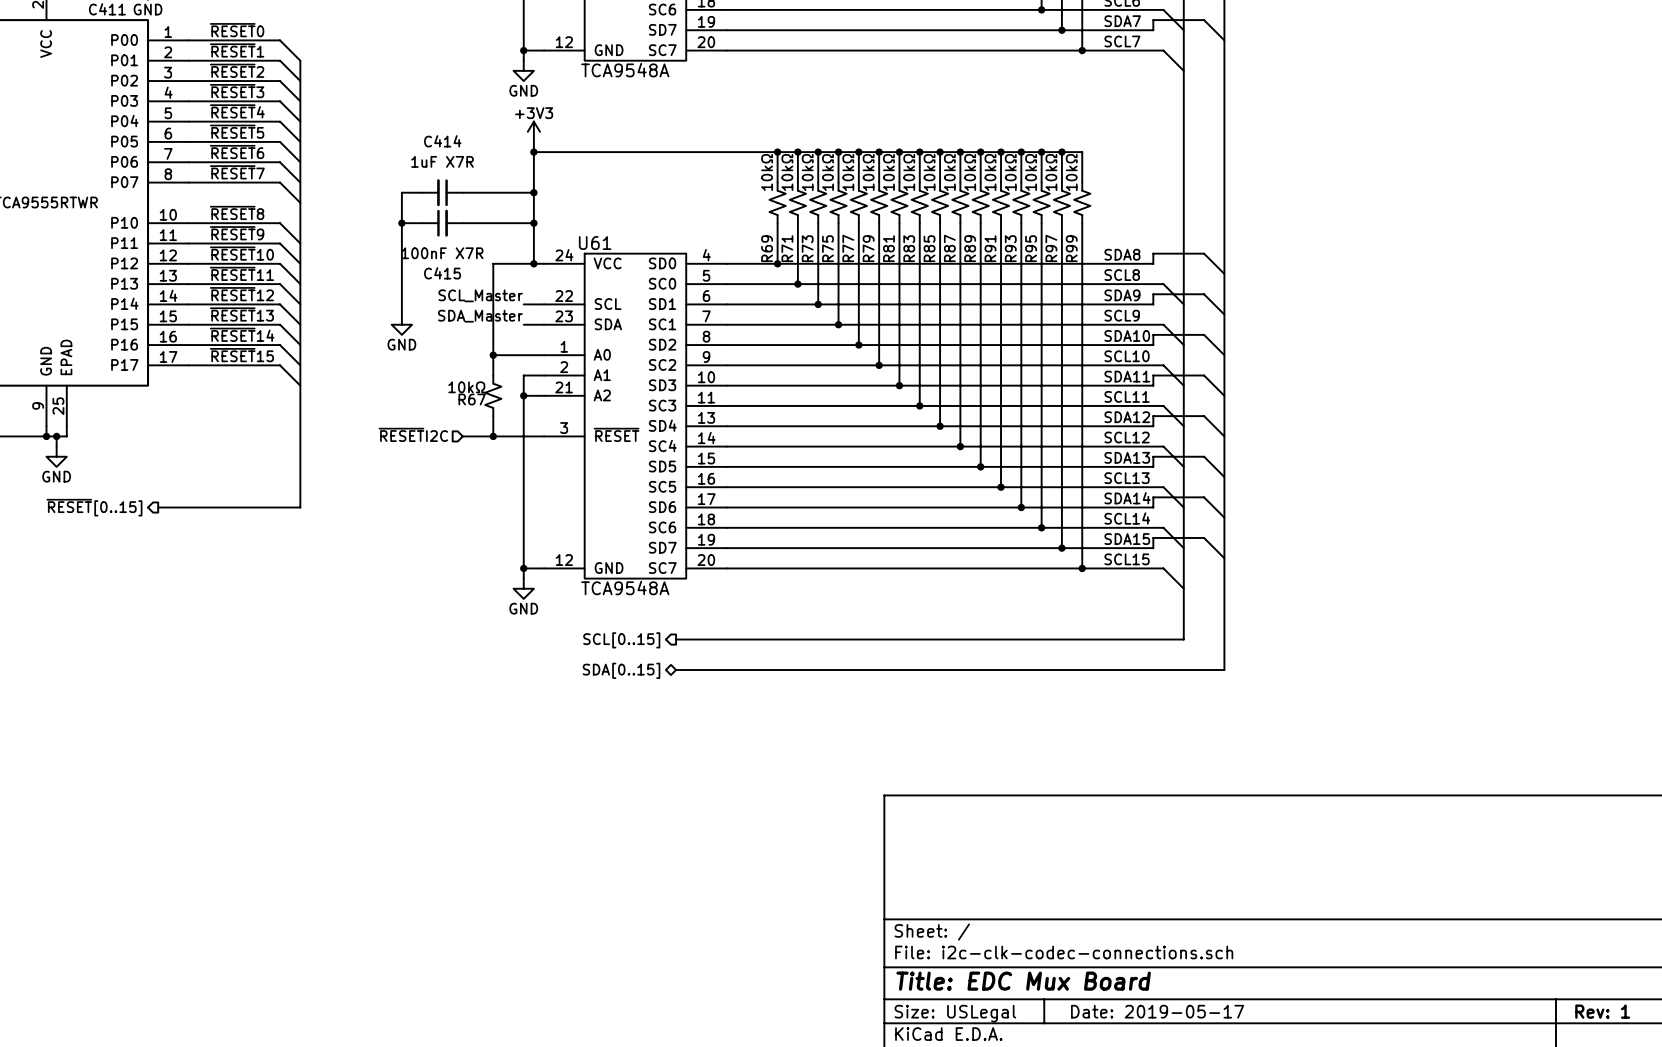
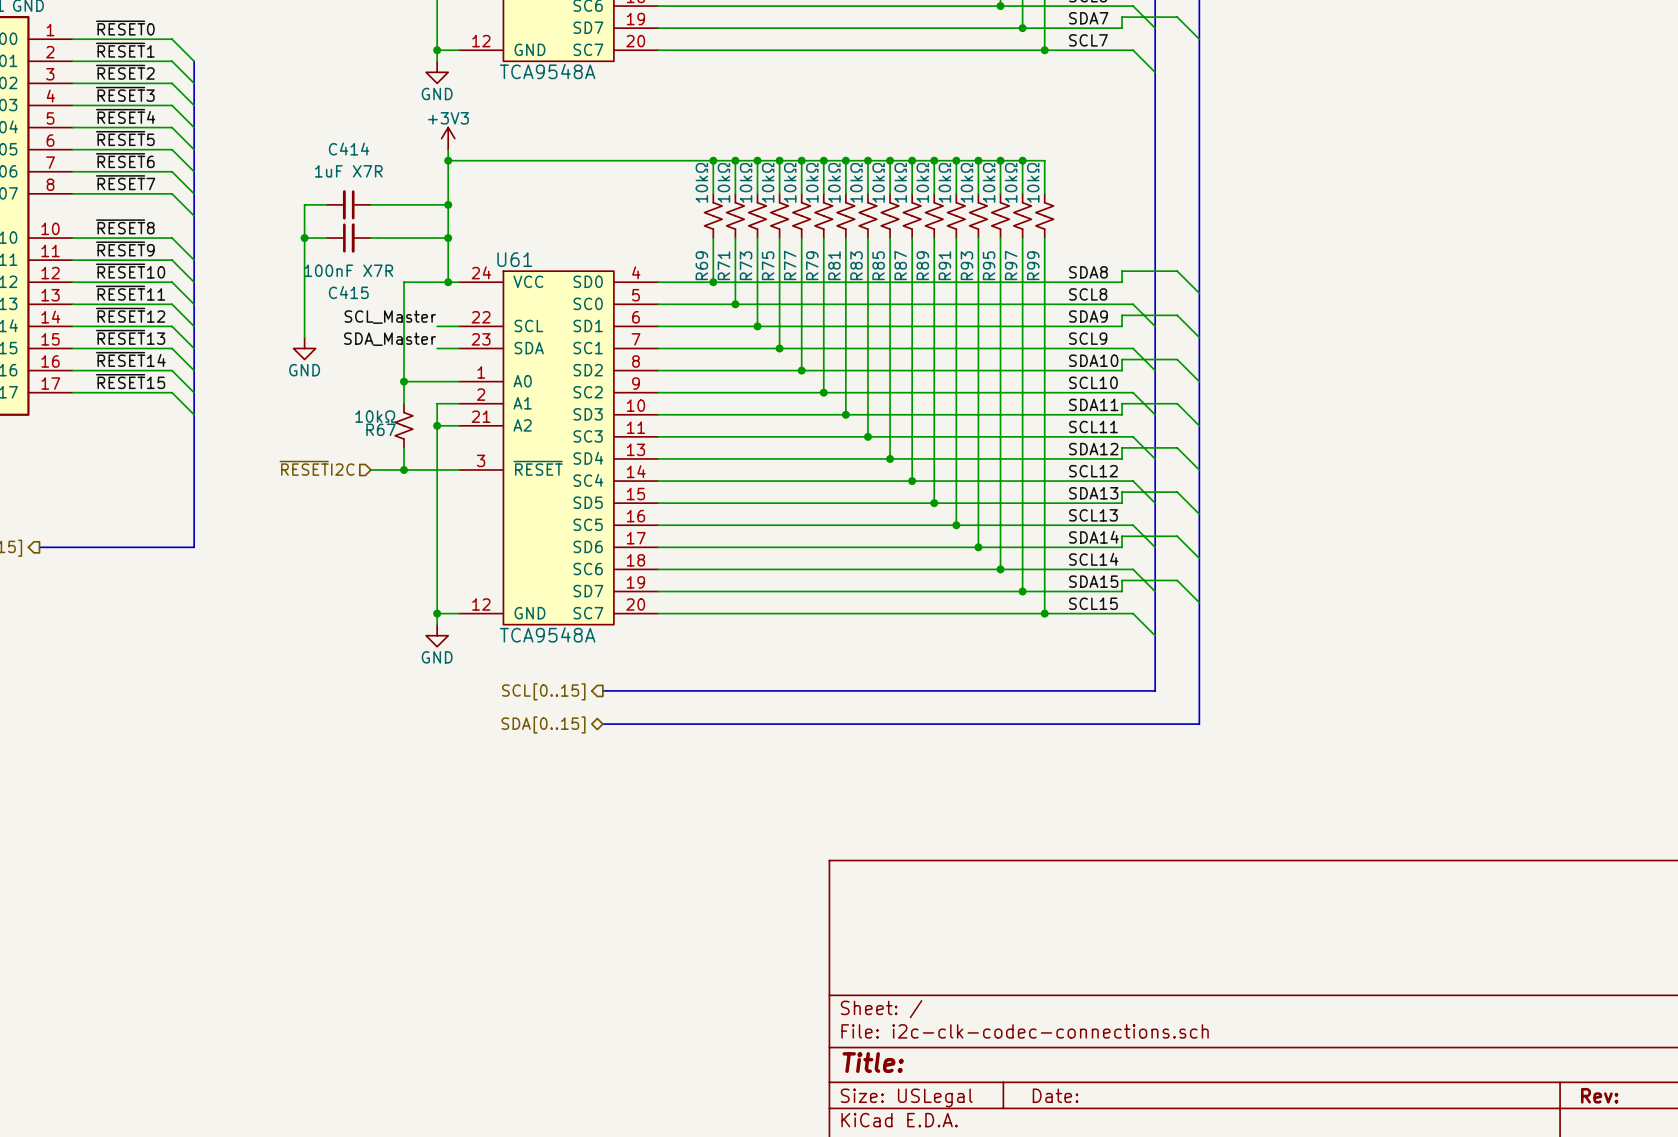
title block: Title: EDC Mux Board (1023, 981) -> Title: (873, 1062)
title block: Date: 2019-05-17 (1157, 1011) -> Date: (1055, 1095)
title block: Rev: 1 (1602, 1011) -> Rev: (1599, 1095)

